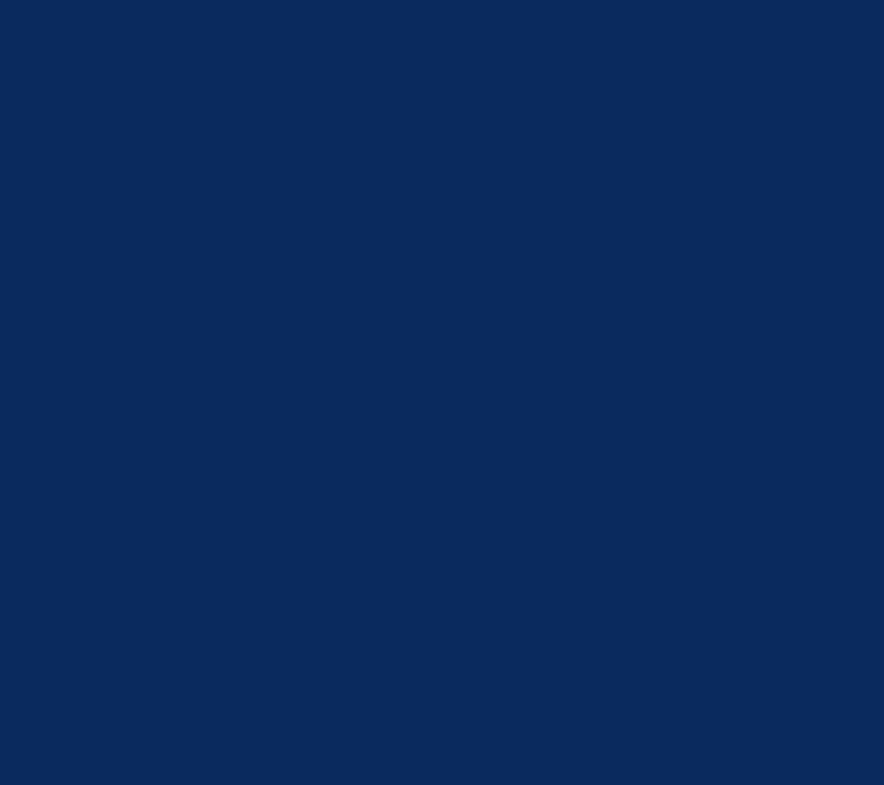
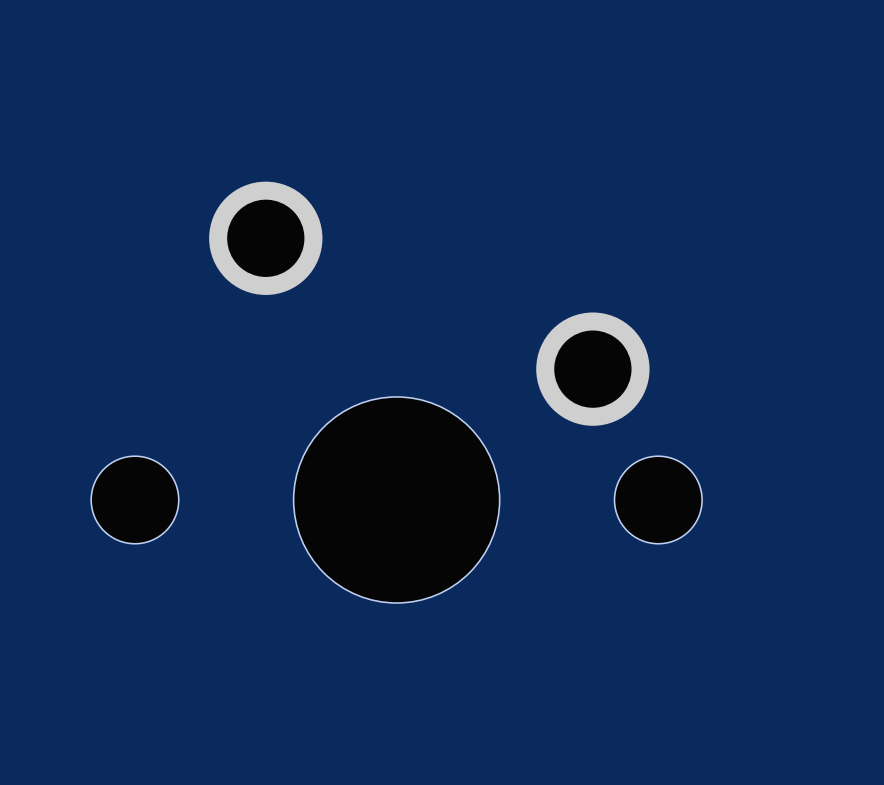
part: none -> (396, 392)

